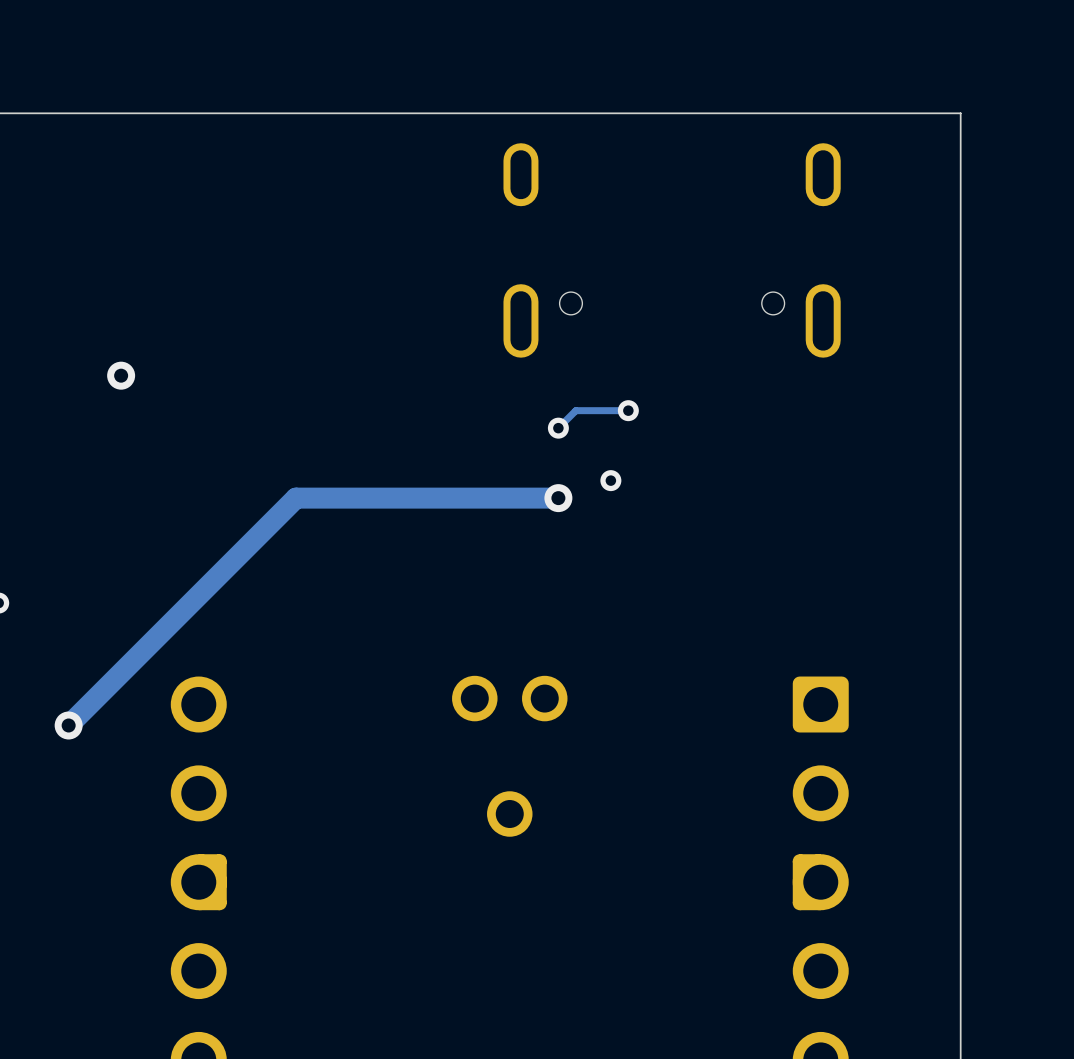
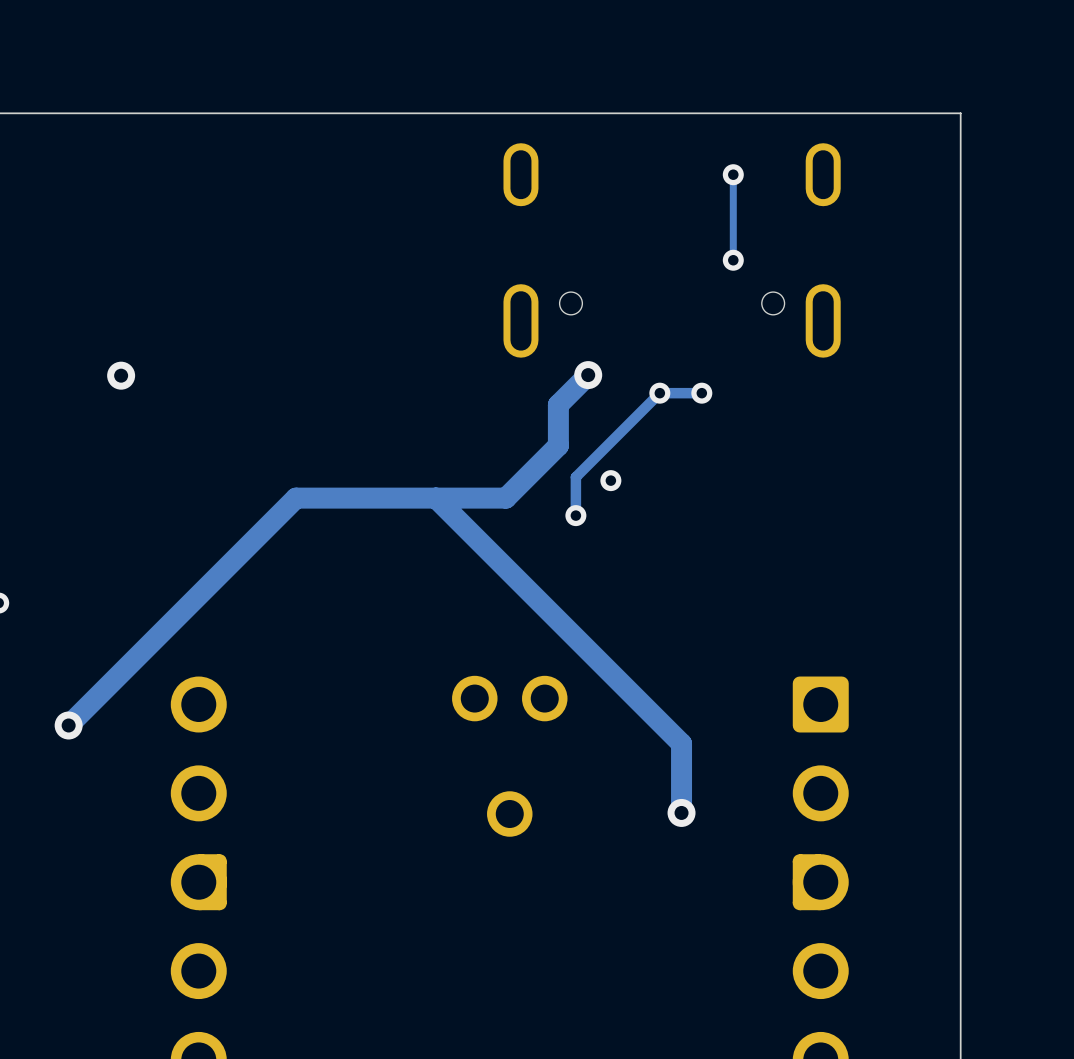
track: none -> (733, 174) (733, 260)
via: none -> (733, 174)
via: none -> (733, 260)
track: none -> (701, 393) (659, 393) (575, 477) (575, 515)
via: none -> (701, 393)
track: (628, 410) (575, 410) (558, 428) -> none
via position: (628, 410) -> (659, 393)
via: (558, 428) -> none
track: none -> (435, 498) (681, 743) (681, 812)
track: (558, 498) (505, 498) -> (588, 375) (558, 404) (558, 445) (505, 498)
via position: (558, 498) -> (588, 375)
via: none -> (575, 515)
via: none -> (681, 812)

